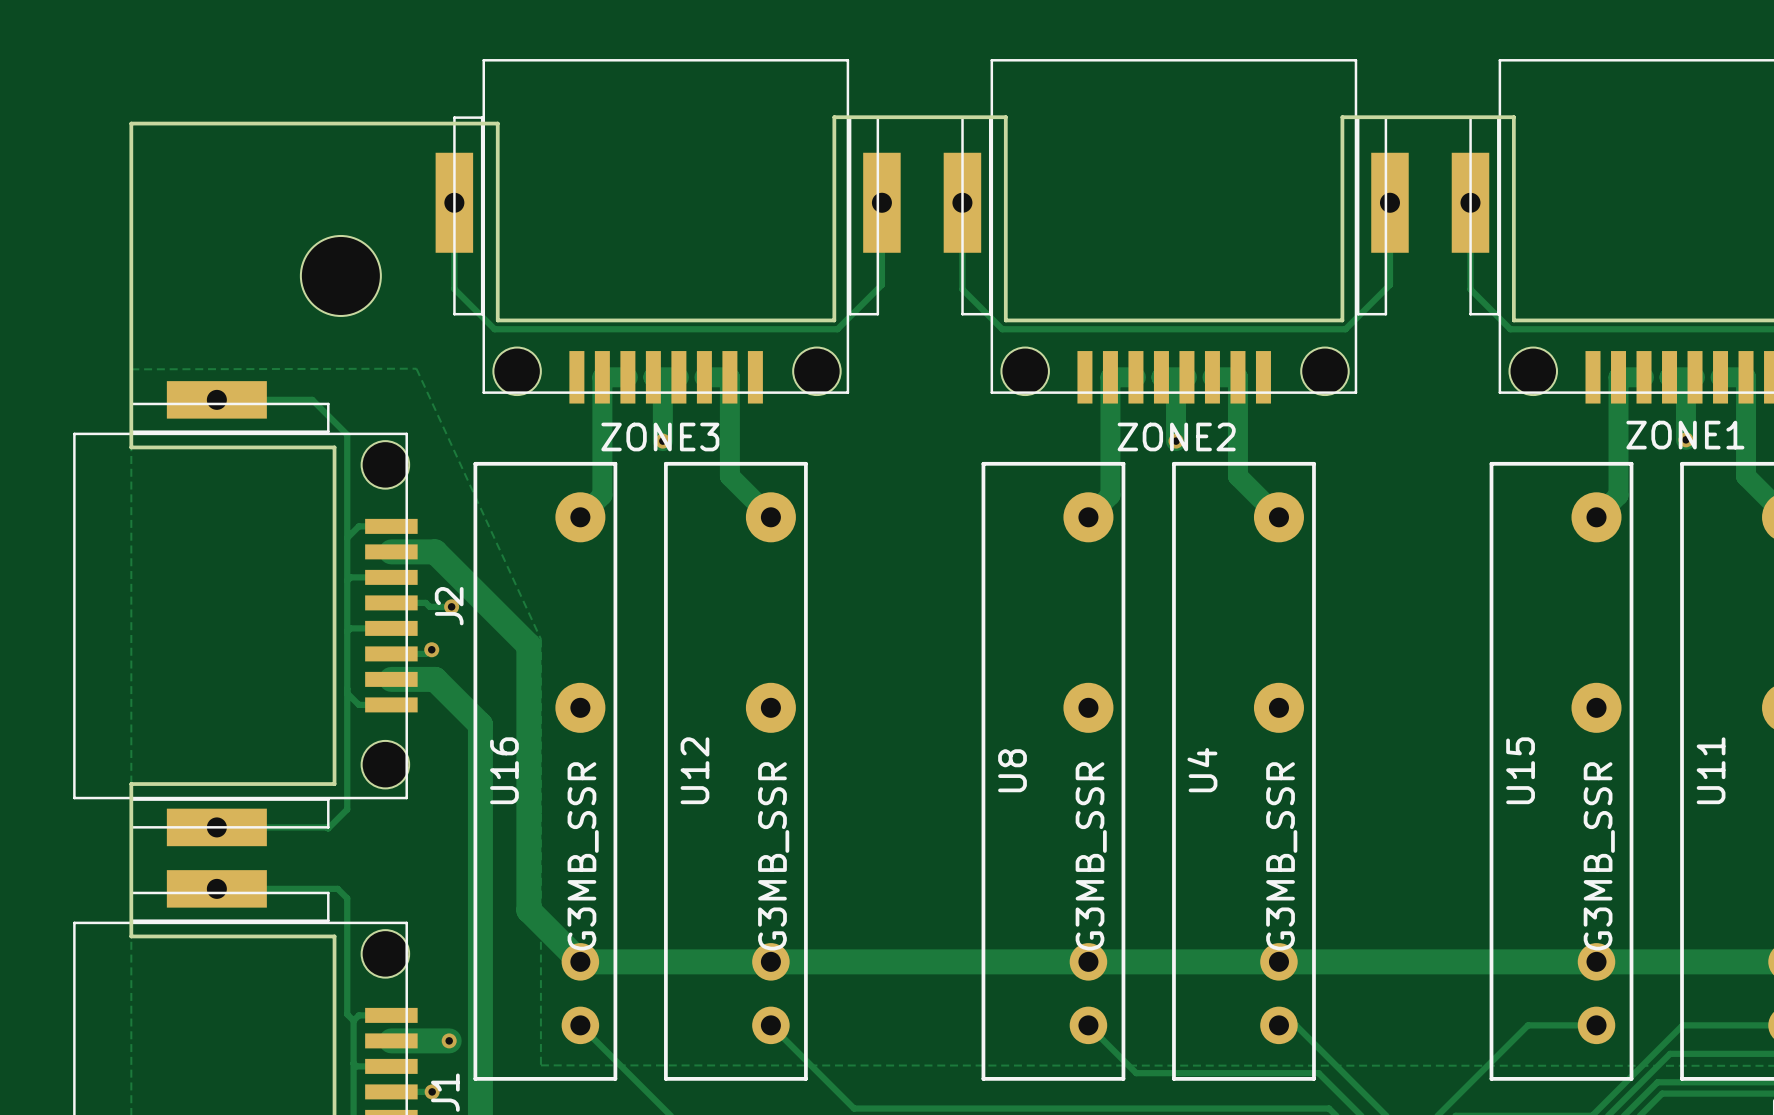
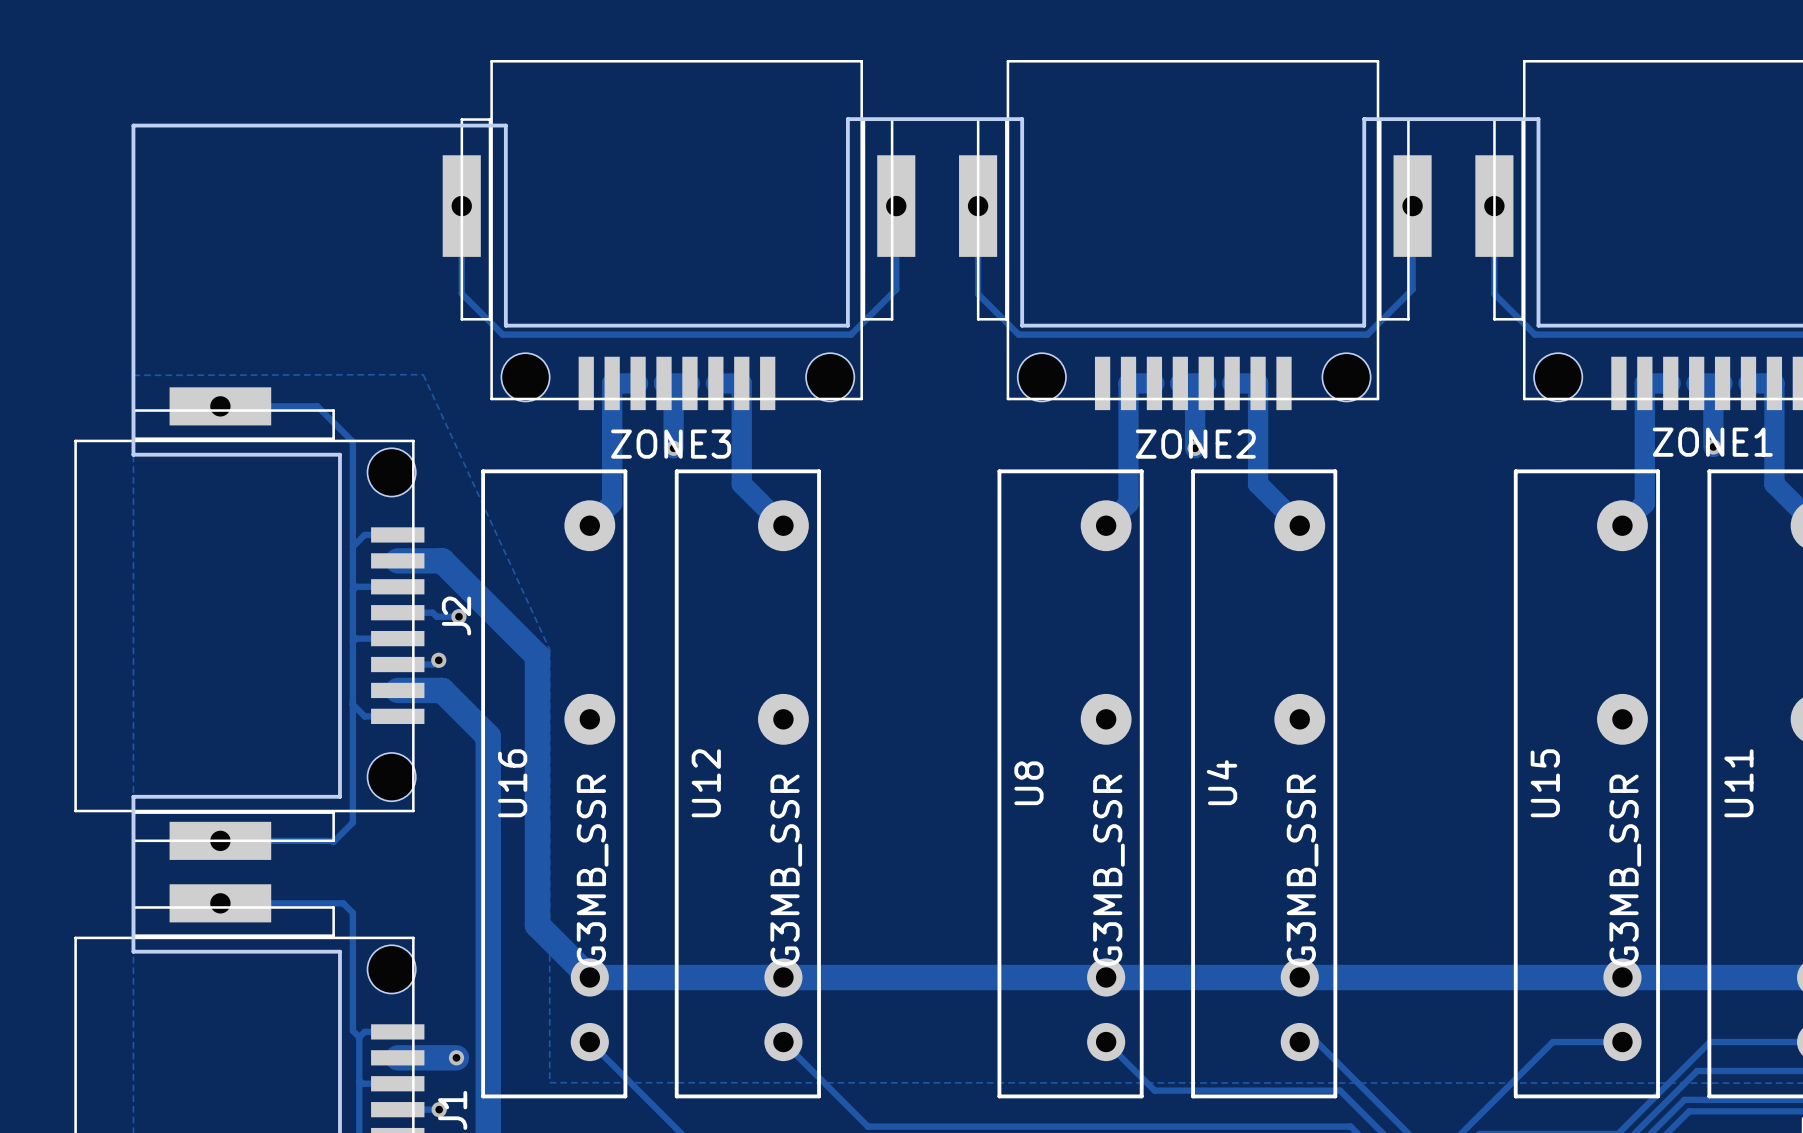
part: (340, 275) -> none

